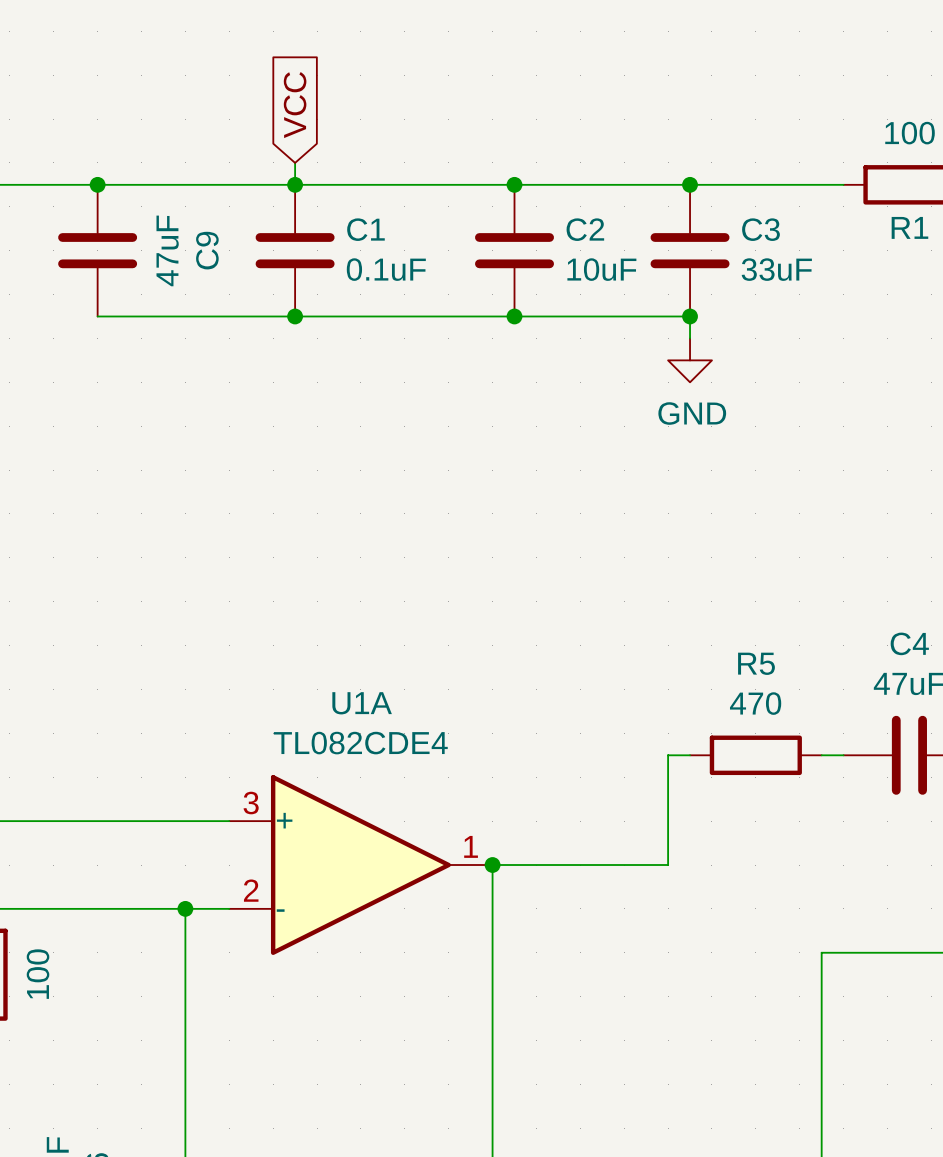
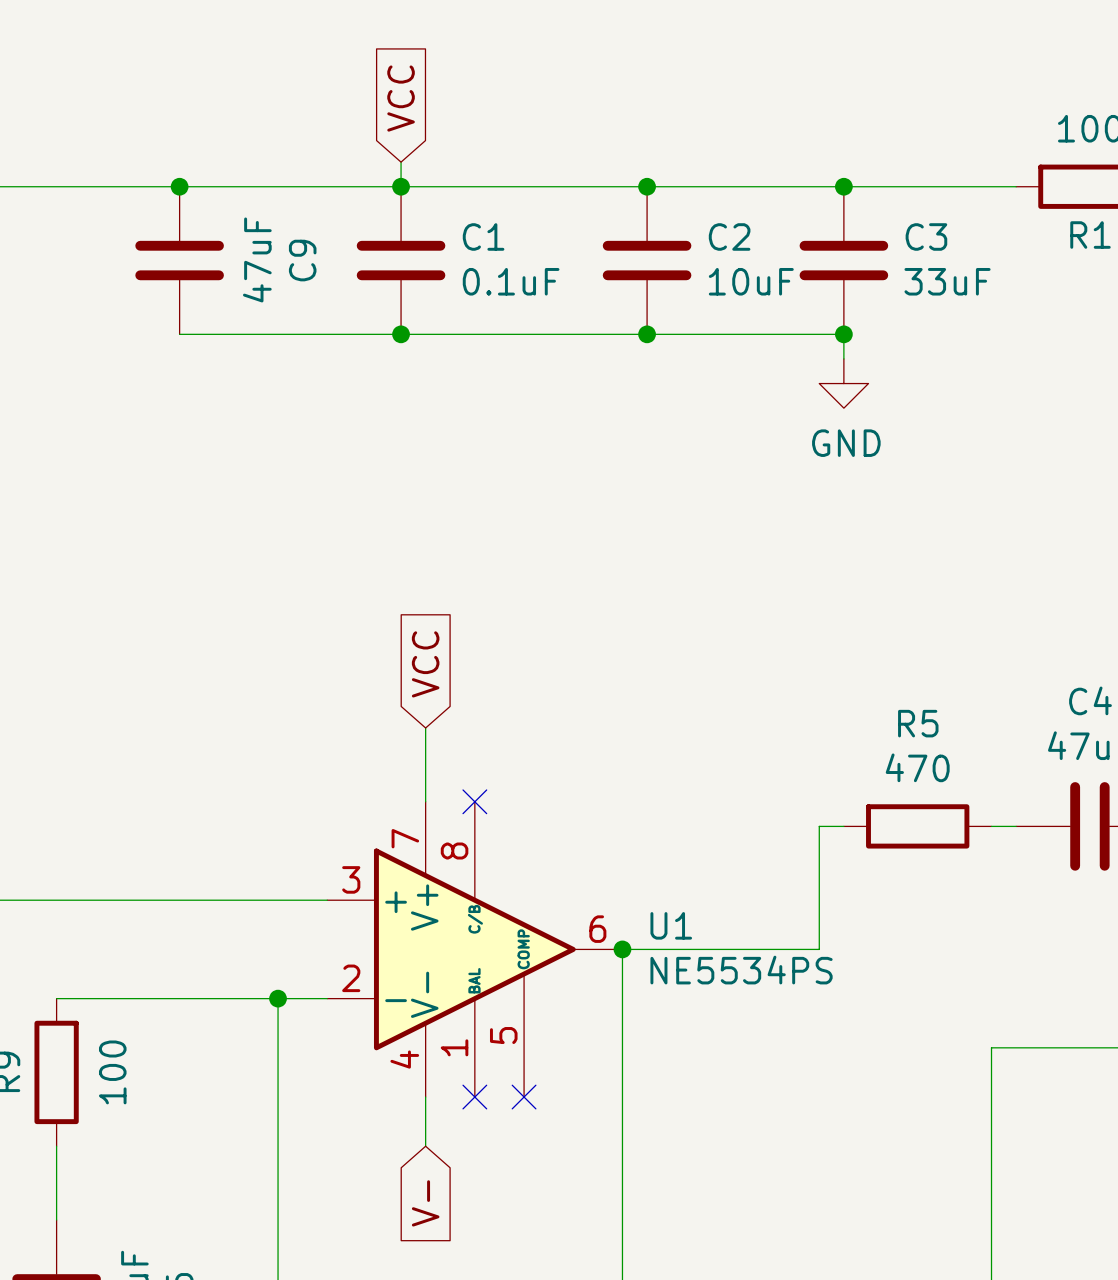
global label: none -> VCC (425, 664)
wire: none -> (425, 727) (425, 801)
no-connect mark: none -> (474, 801)
U1A: TL082CDE4 (360, 865) -> none
U1: none -> NE5534PS (474, 949)
wire: none -> (425, 1097) (425, 1146)
no-connect mark: none -> (474, 1097)
no-connect mark: none -> (524, 1097)
global label: none -> V- (425, 1203)

